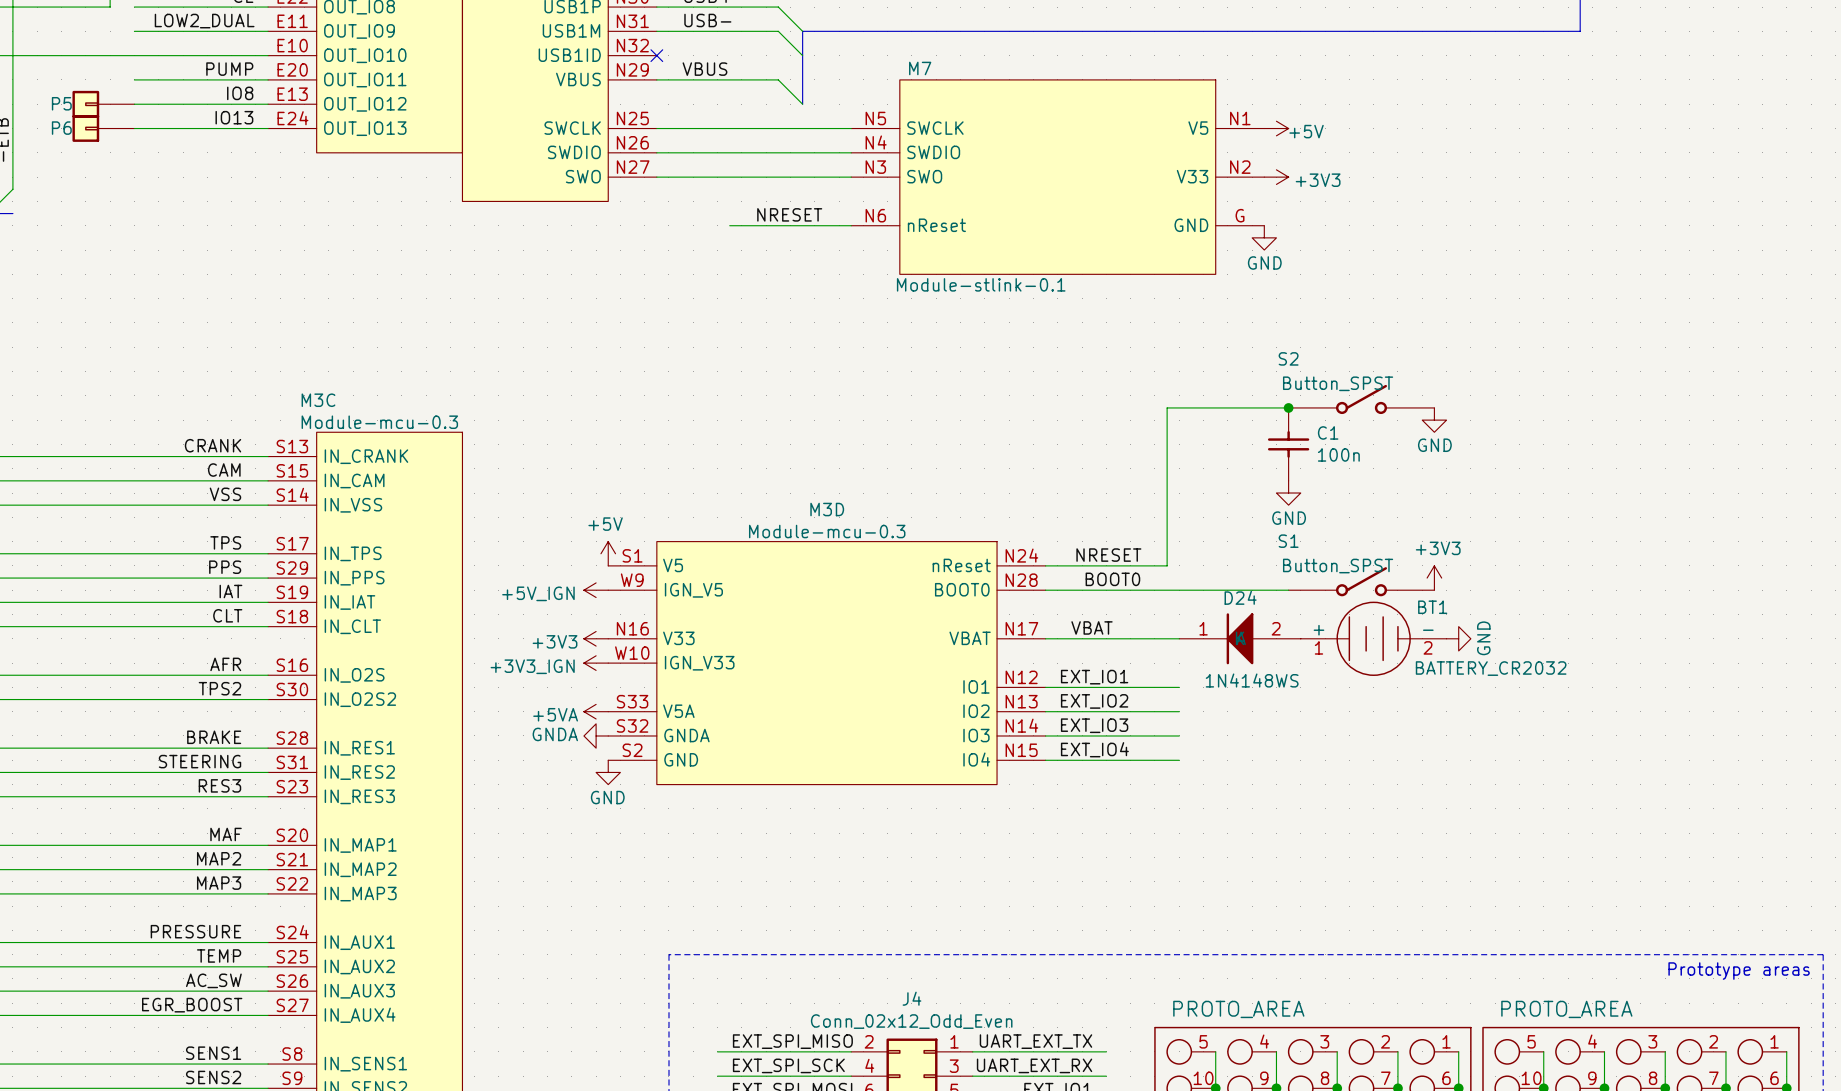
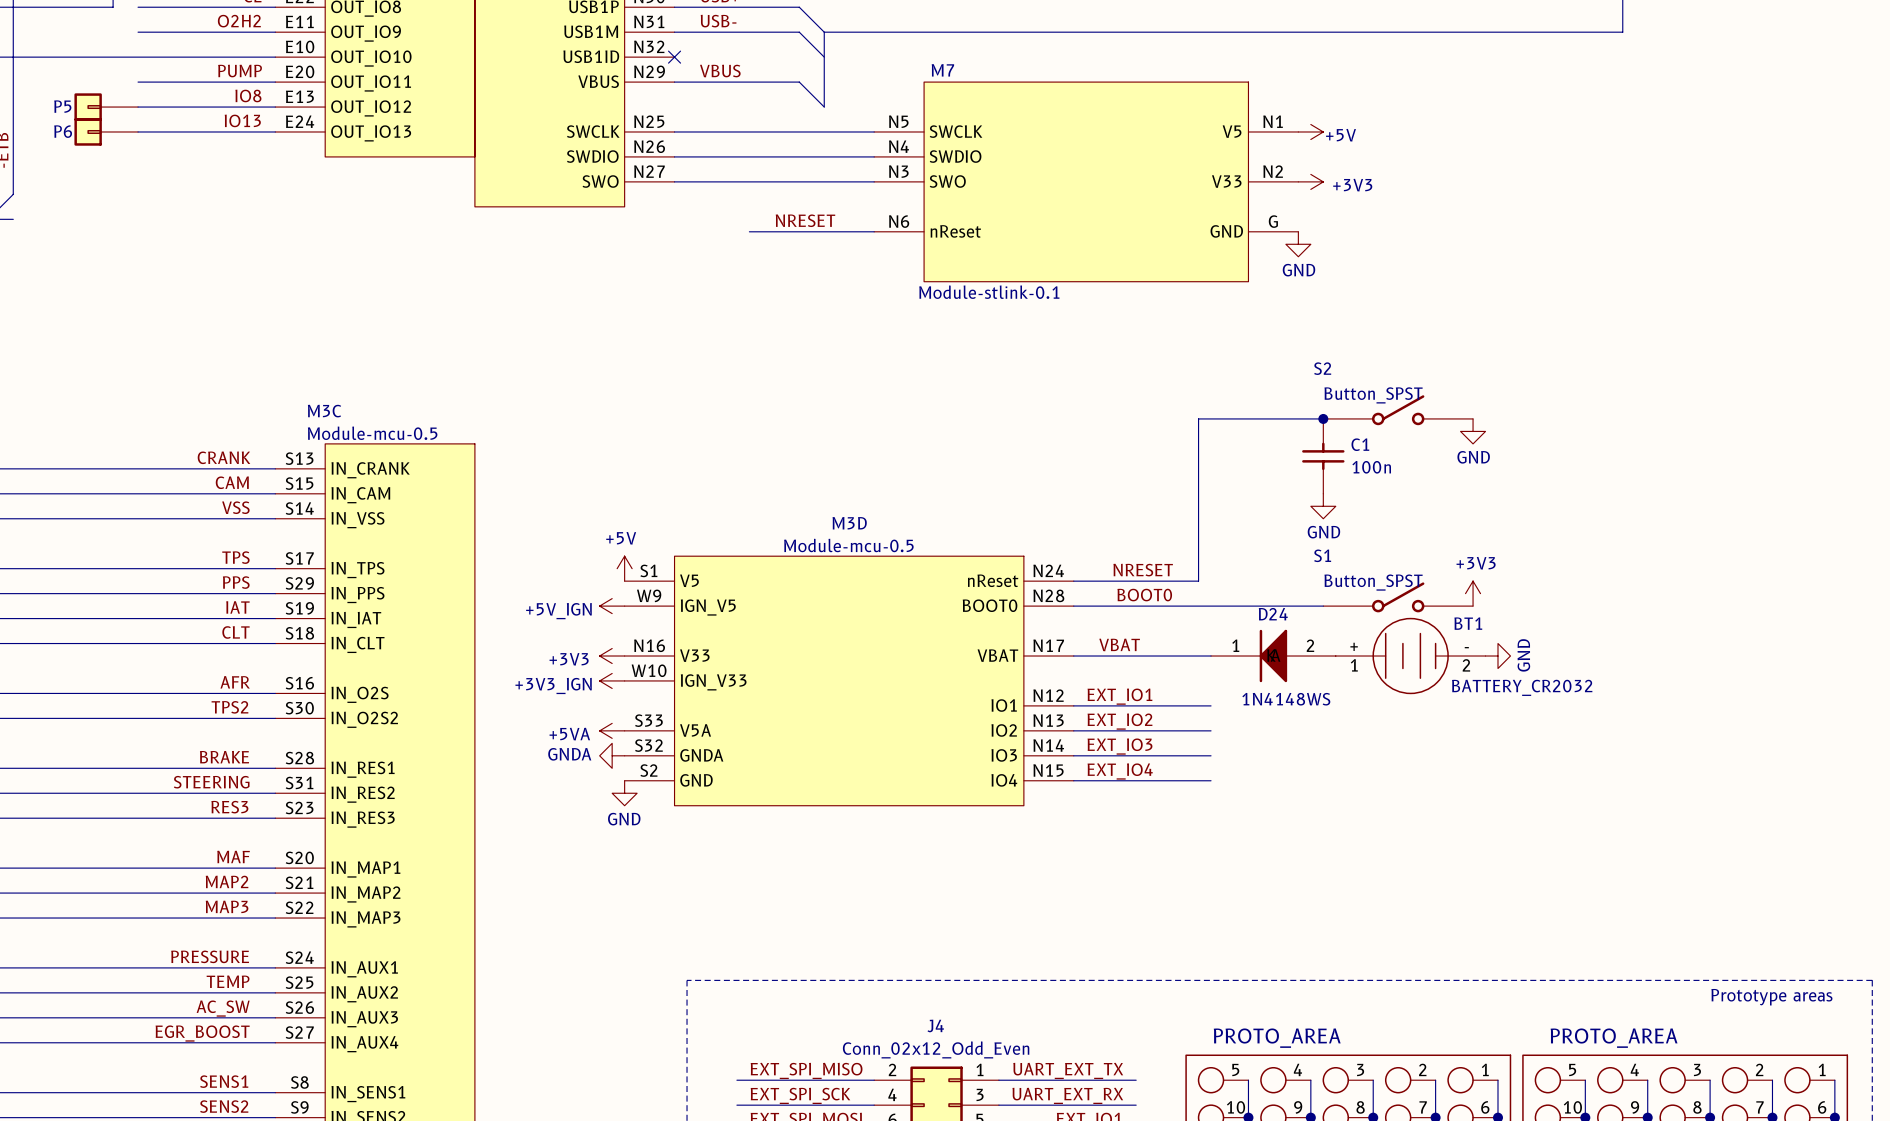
label: LOW2_DUAL (204, 21) -> O2H2 (239, 21)
M3C value: Module-mcu-0.3 (379, 422) -> Module-mcu-0.5 (372, 433)
M3D value: Module-mcu-0.3 (827, 531) -> Module-mcu-0.5 (848, 545)

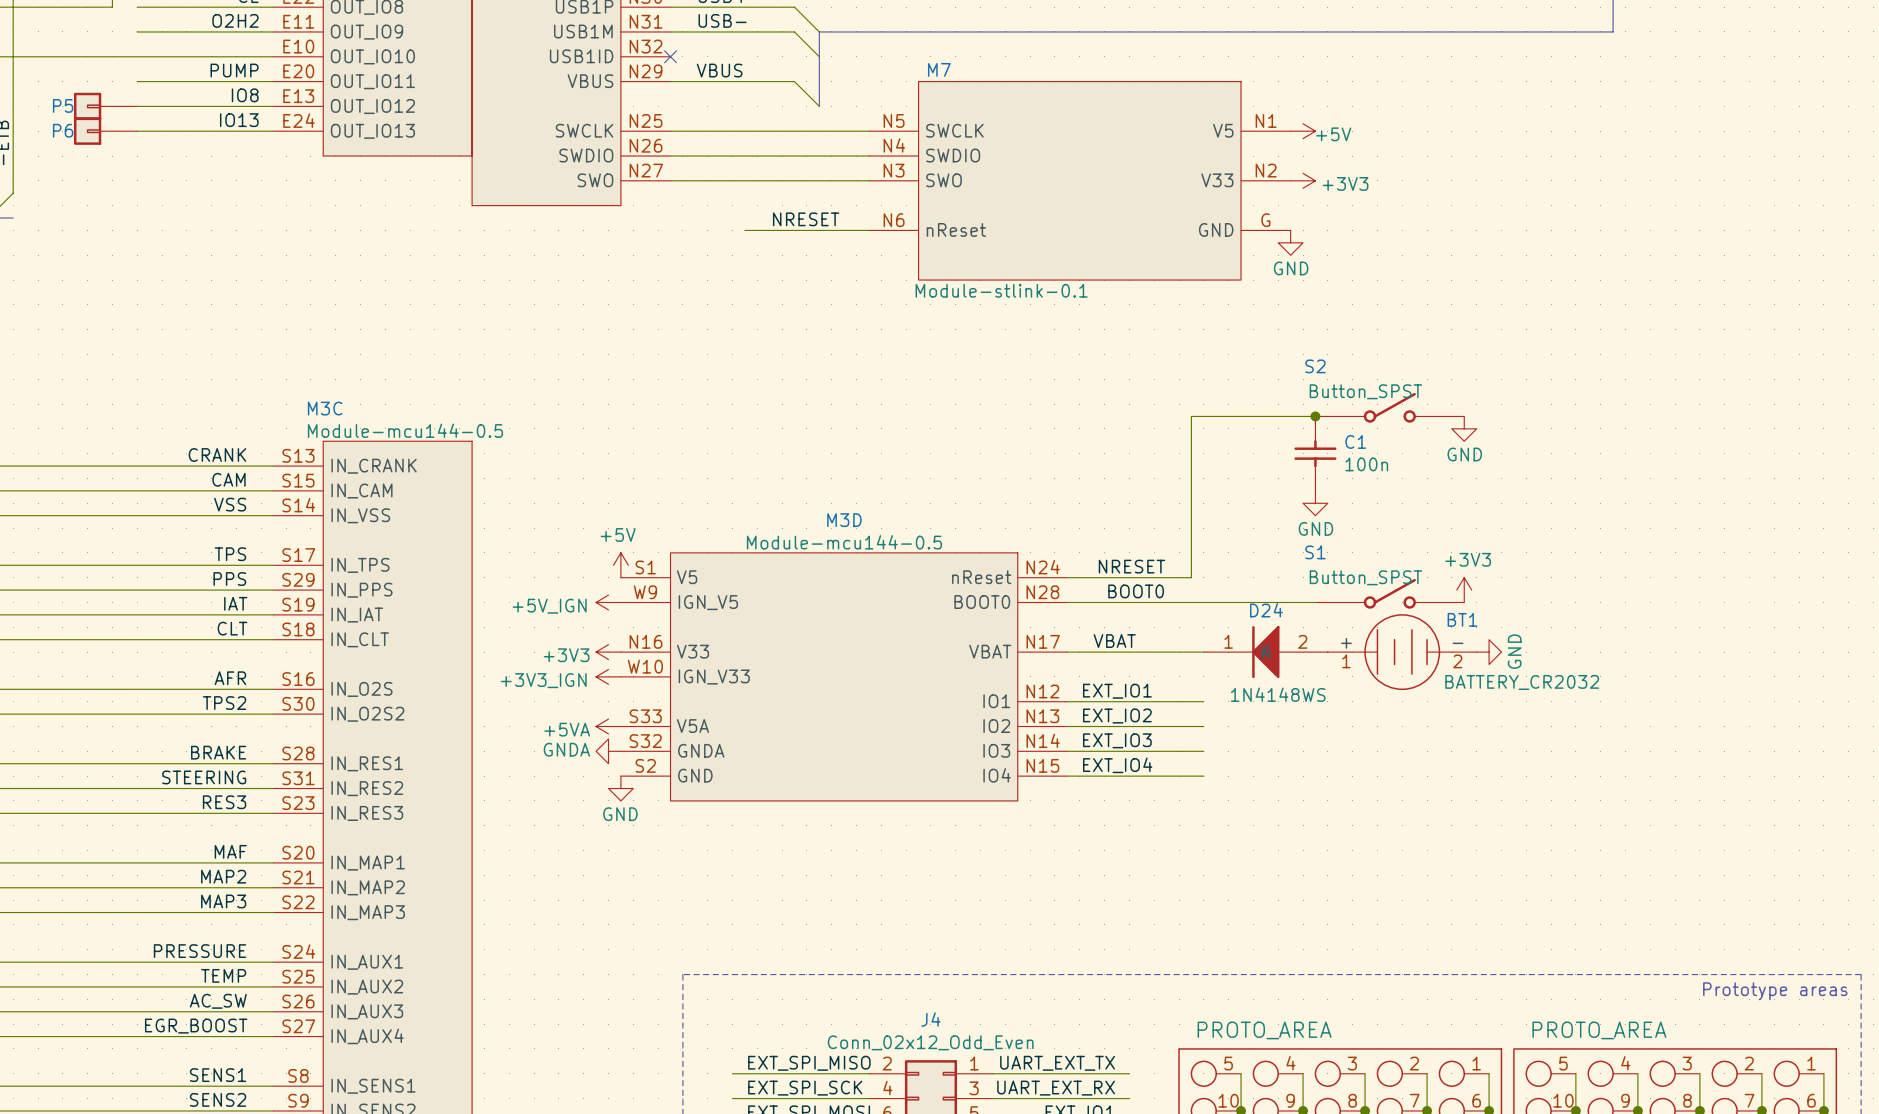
M3C value: Module-mcu-0.5 (372, 433) -> Module-mcu144-0.5 (405, 430)
M3D value: Module-mcu-0.5 (848, 545) -> Module-mcu144-0.5 (844, 542)

